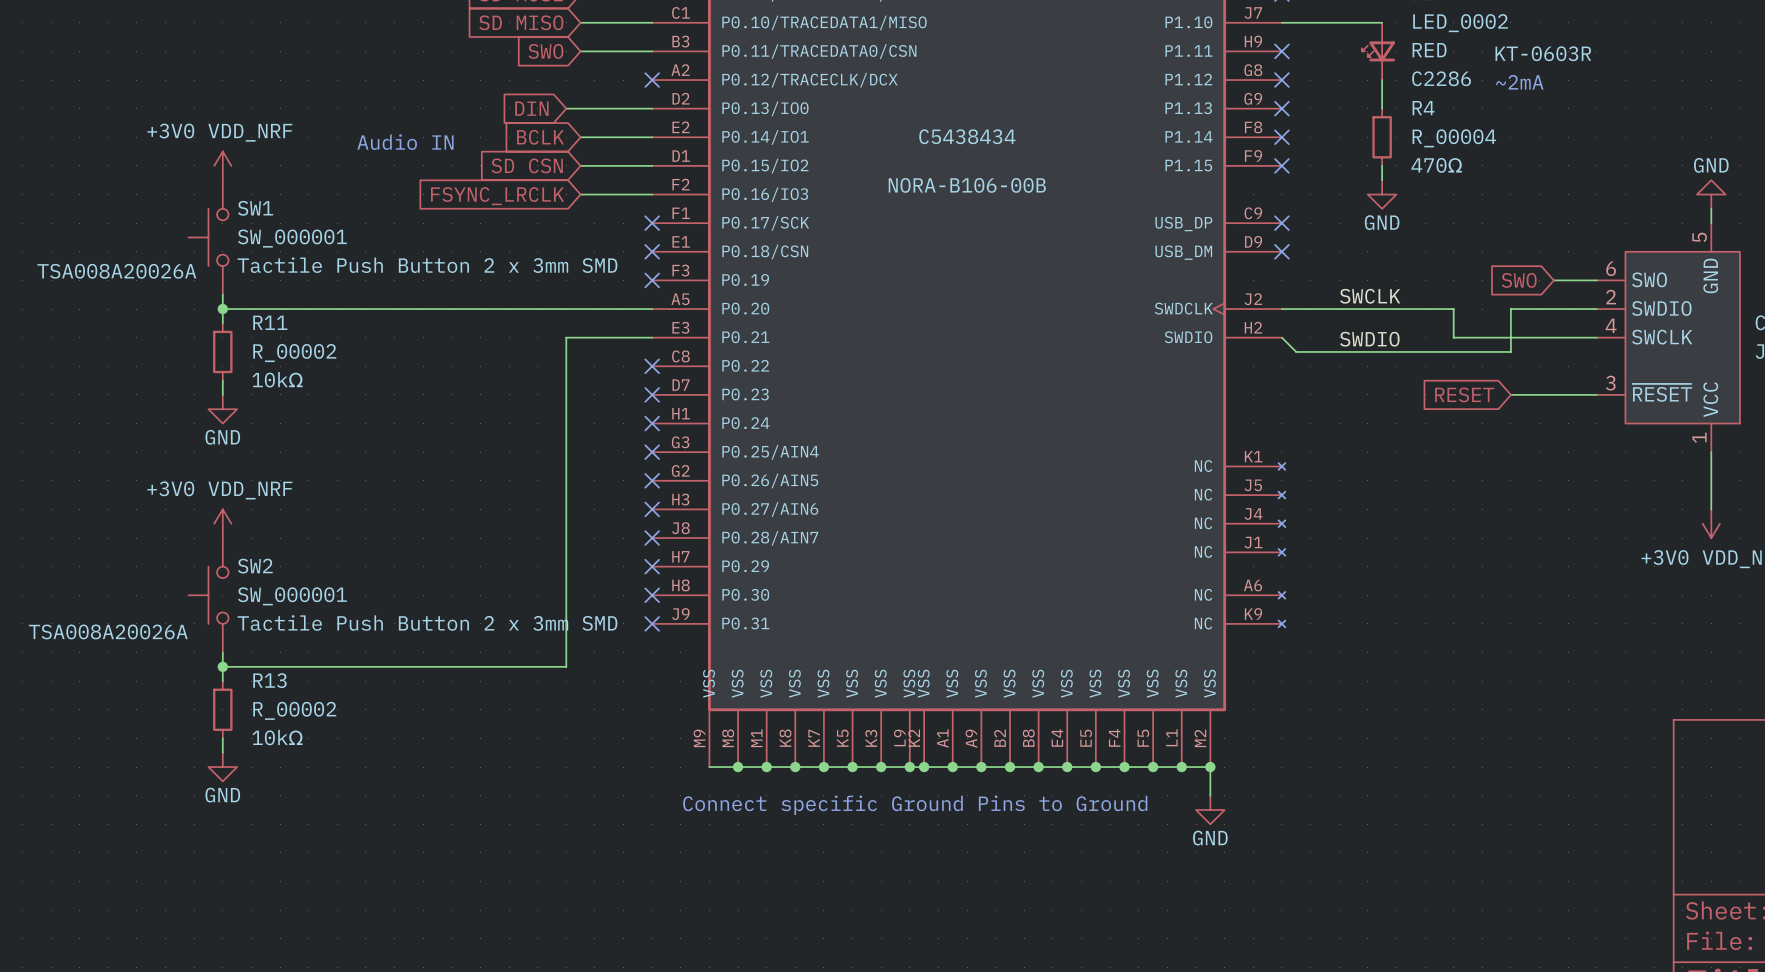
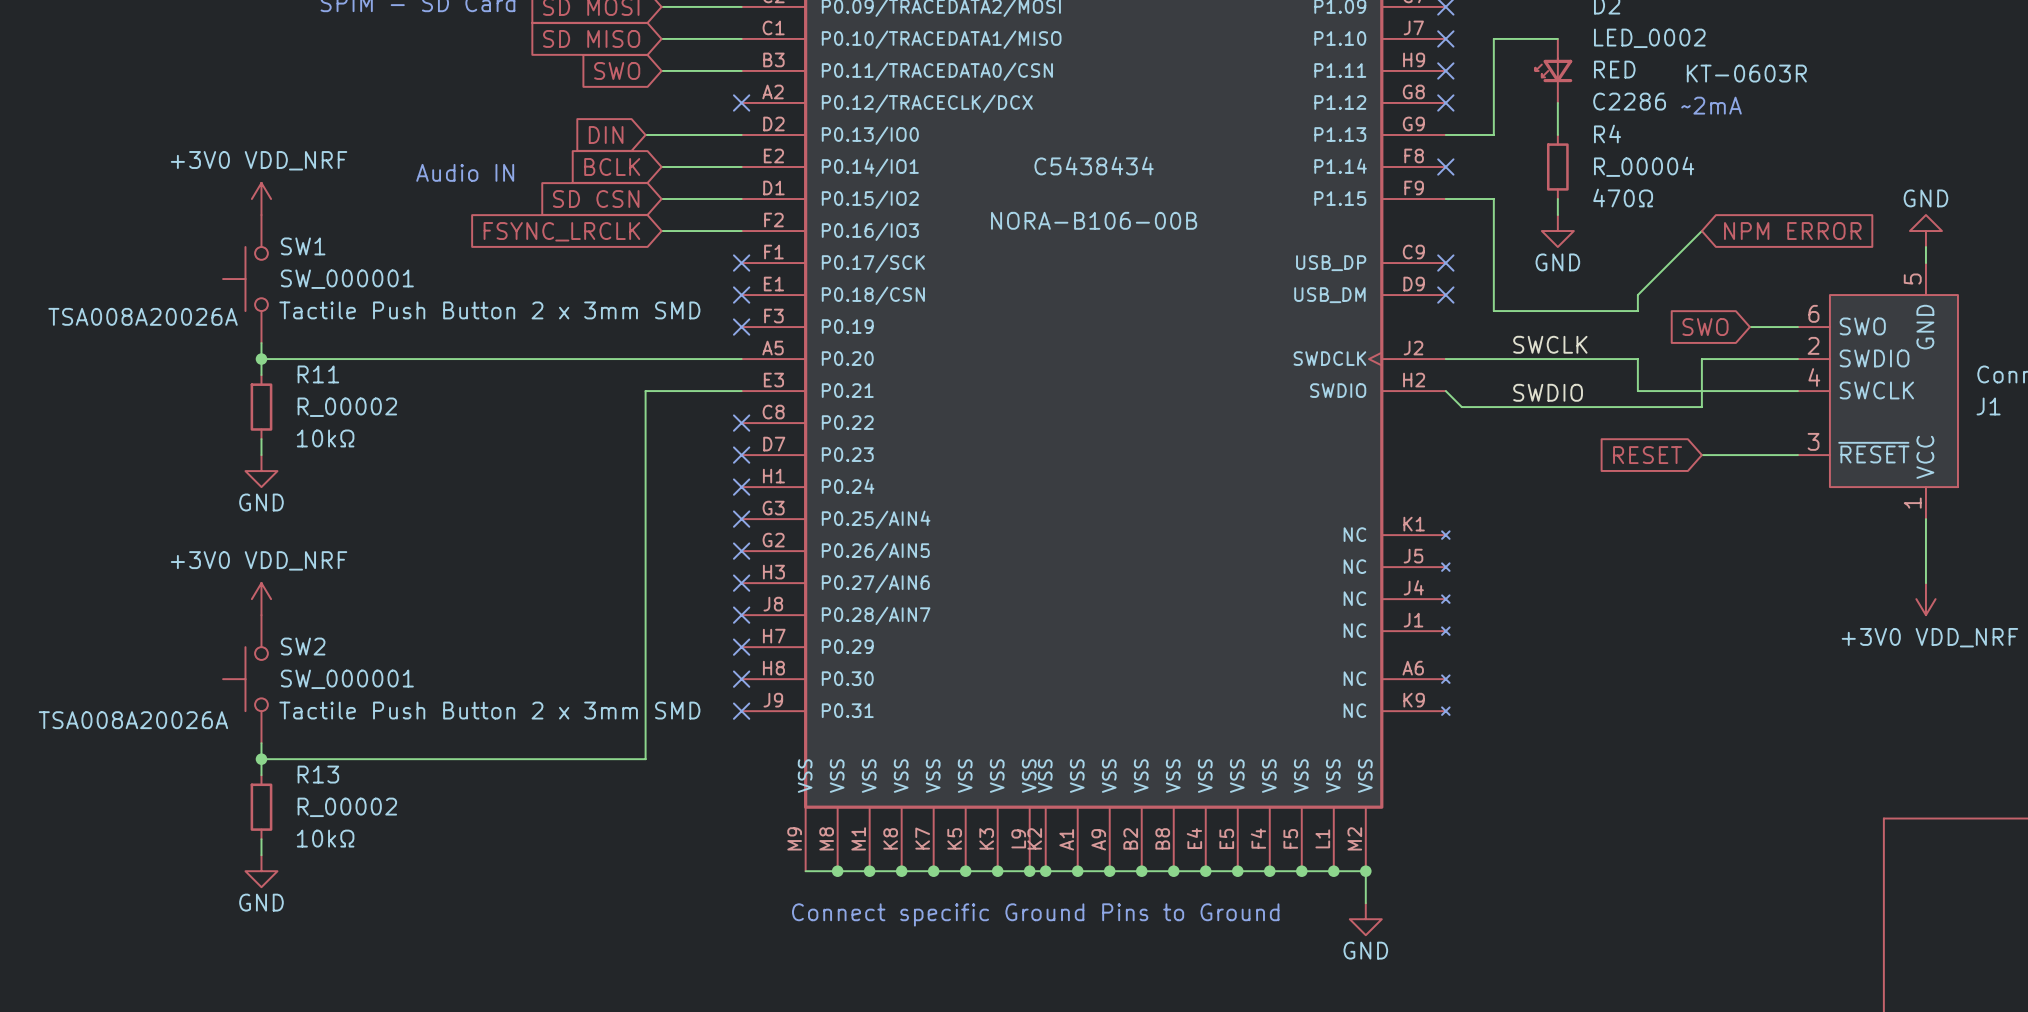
wire: (1281, 22) (1324, 22) -> (1445, 134) (1493, 134) (1493, 38)
no-connect mark: none -> (1445, 38)
no-connect mark: (1281, 108) -> none
wire: none -> (1445, 199) (1493, 199) (1493, 311) (1637, 311) (1637, 295) (1701, 231)
no-connect mark: (1281, 165) -> none
global label: none -> NPM ERROR (1792, 231)

